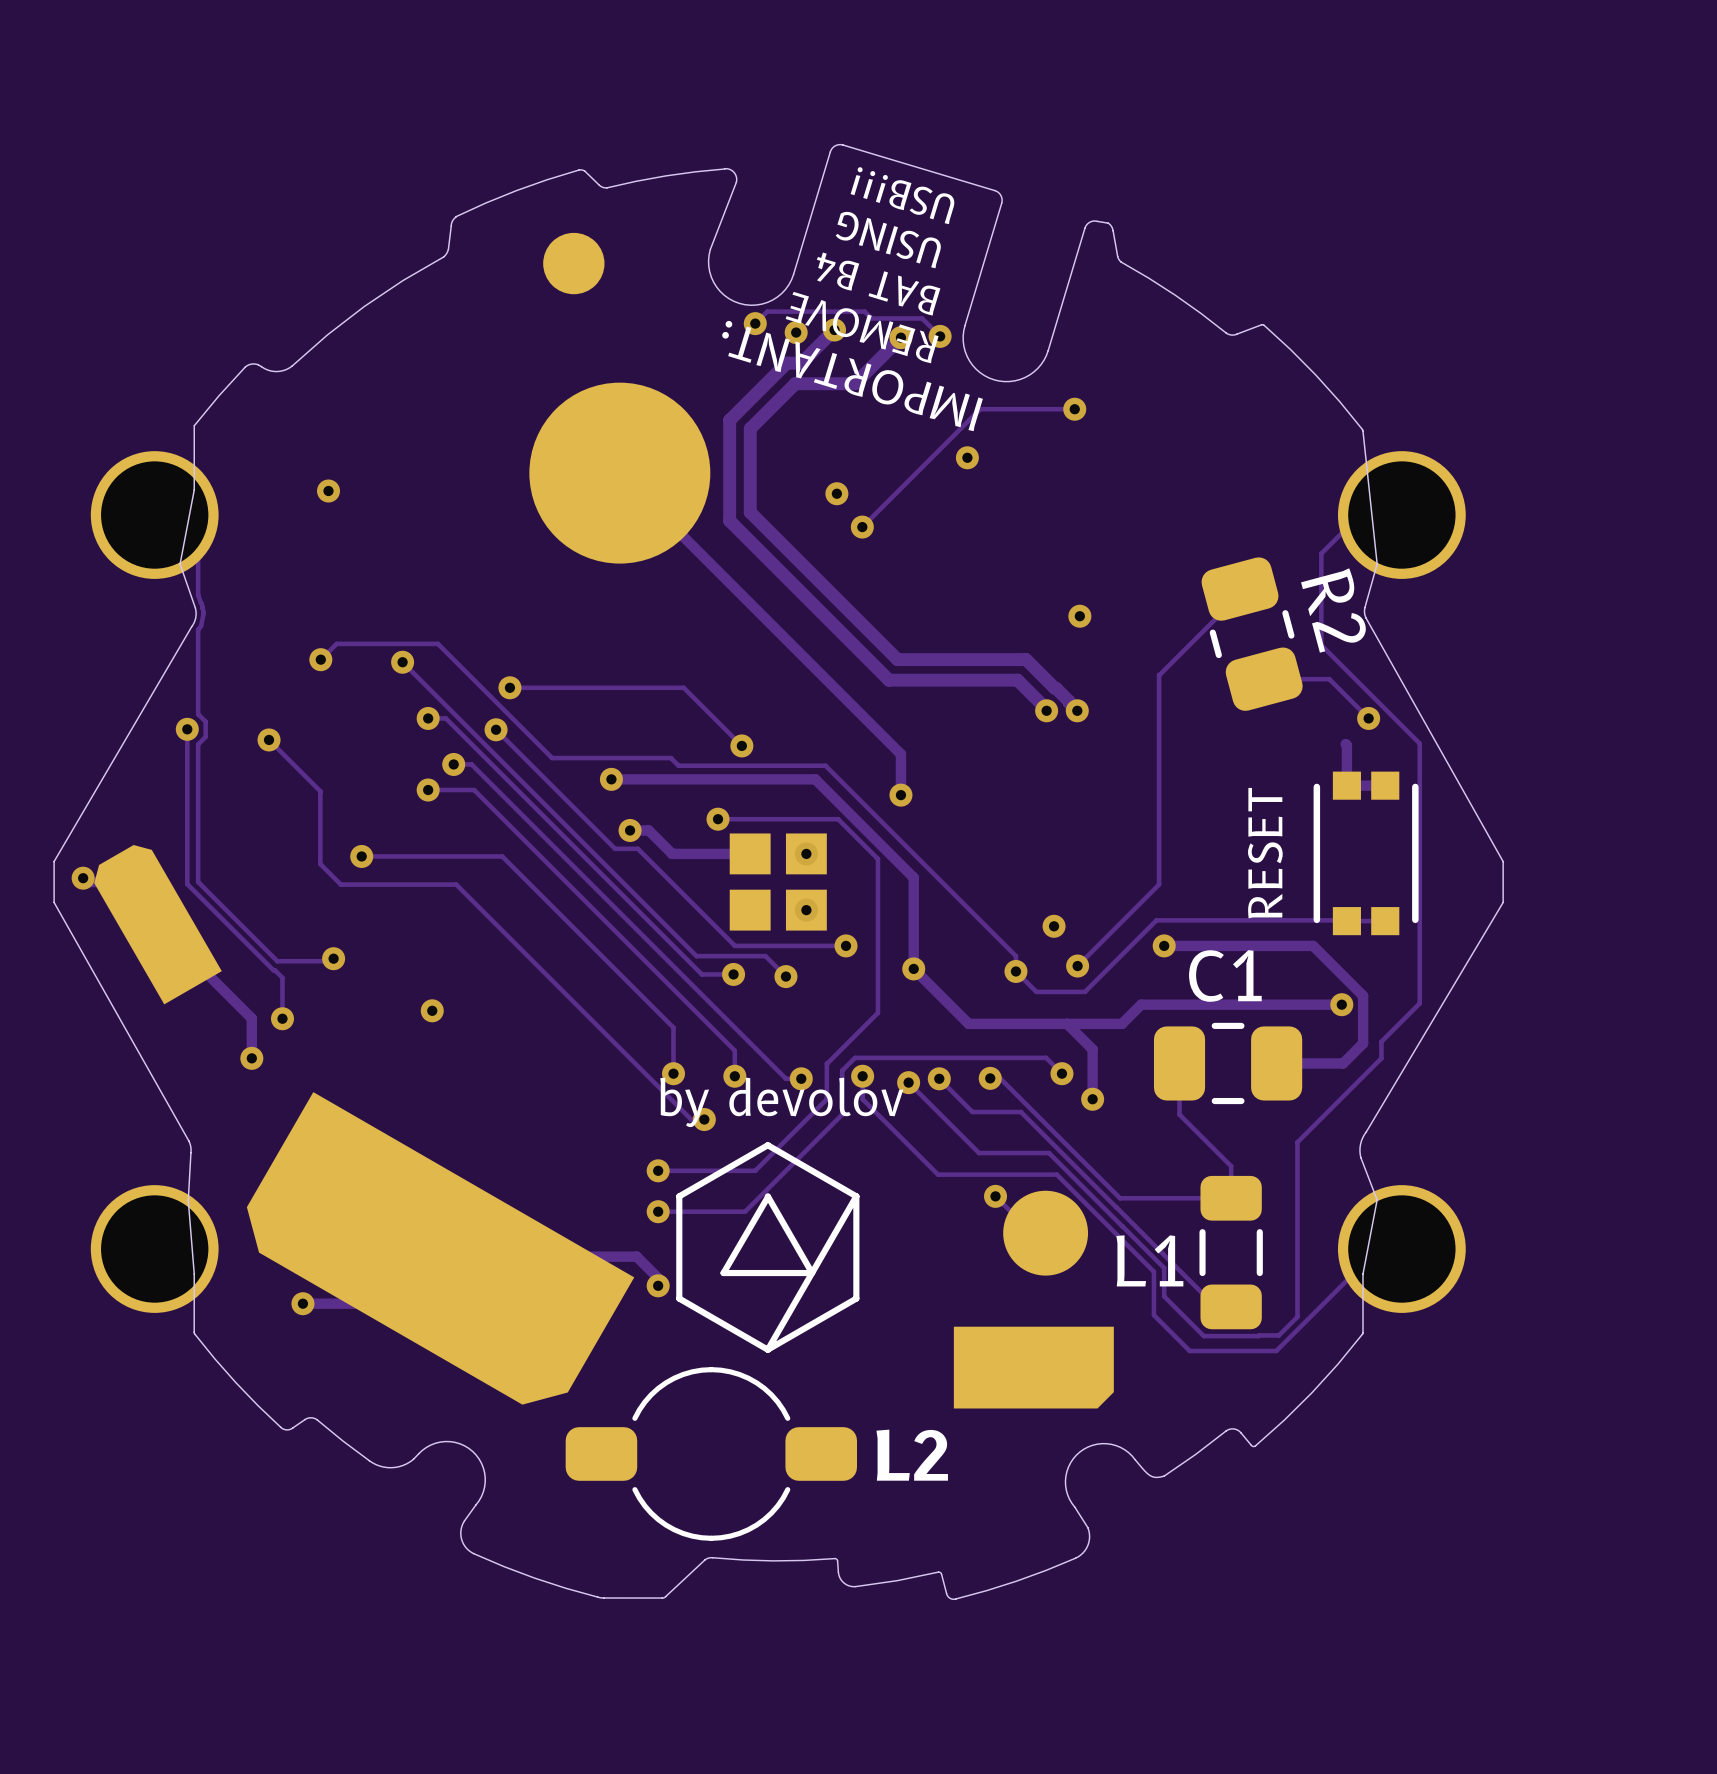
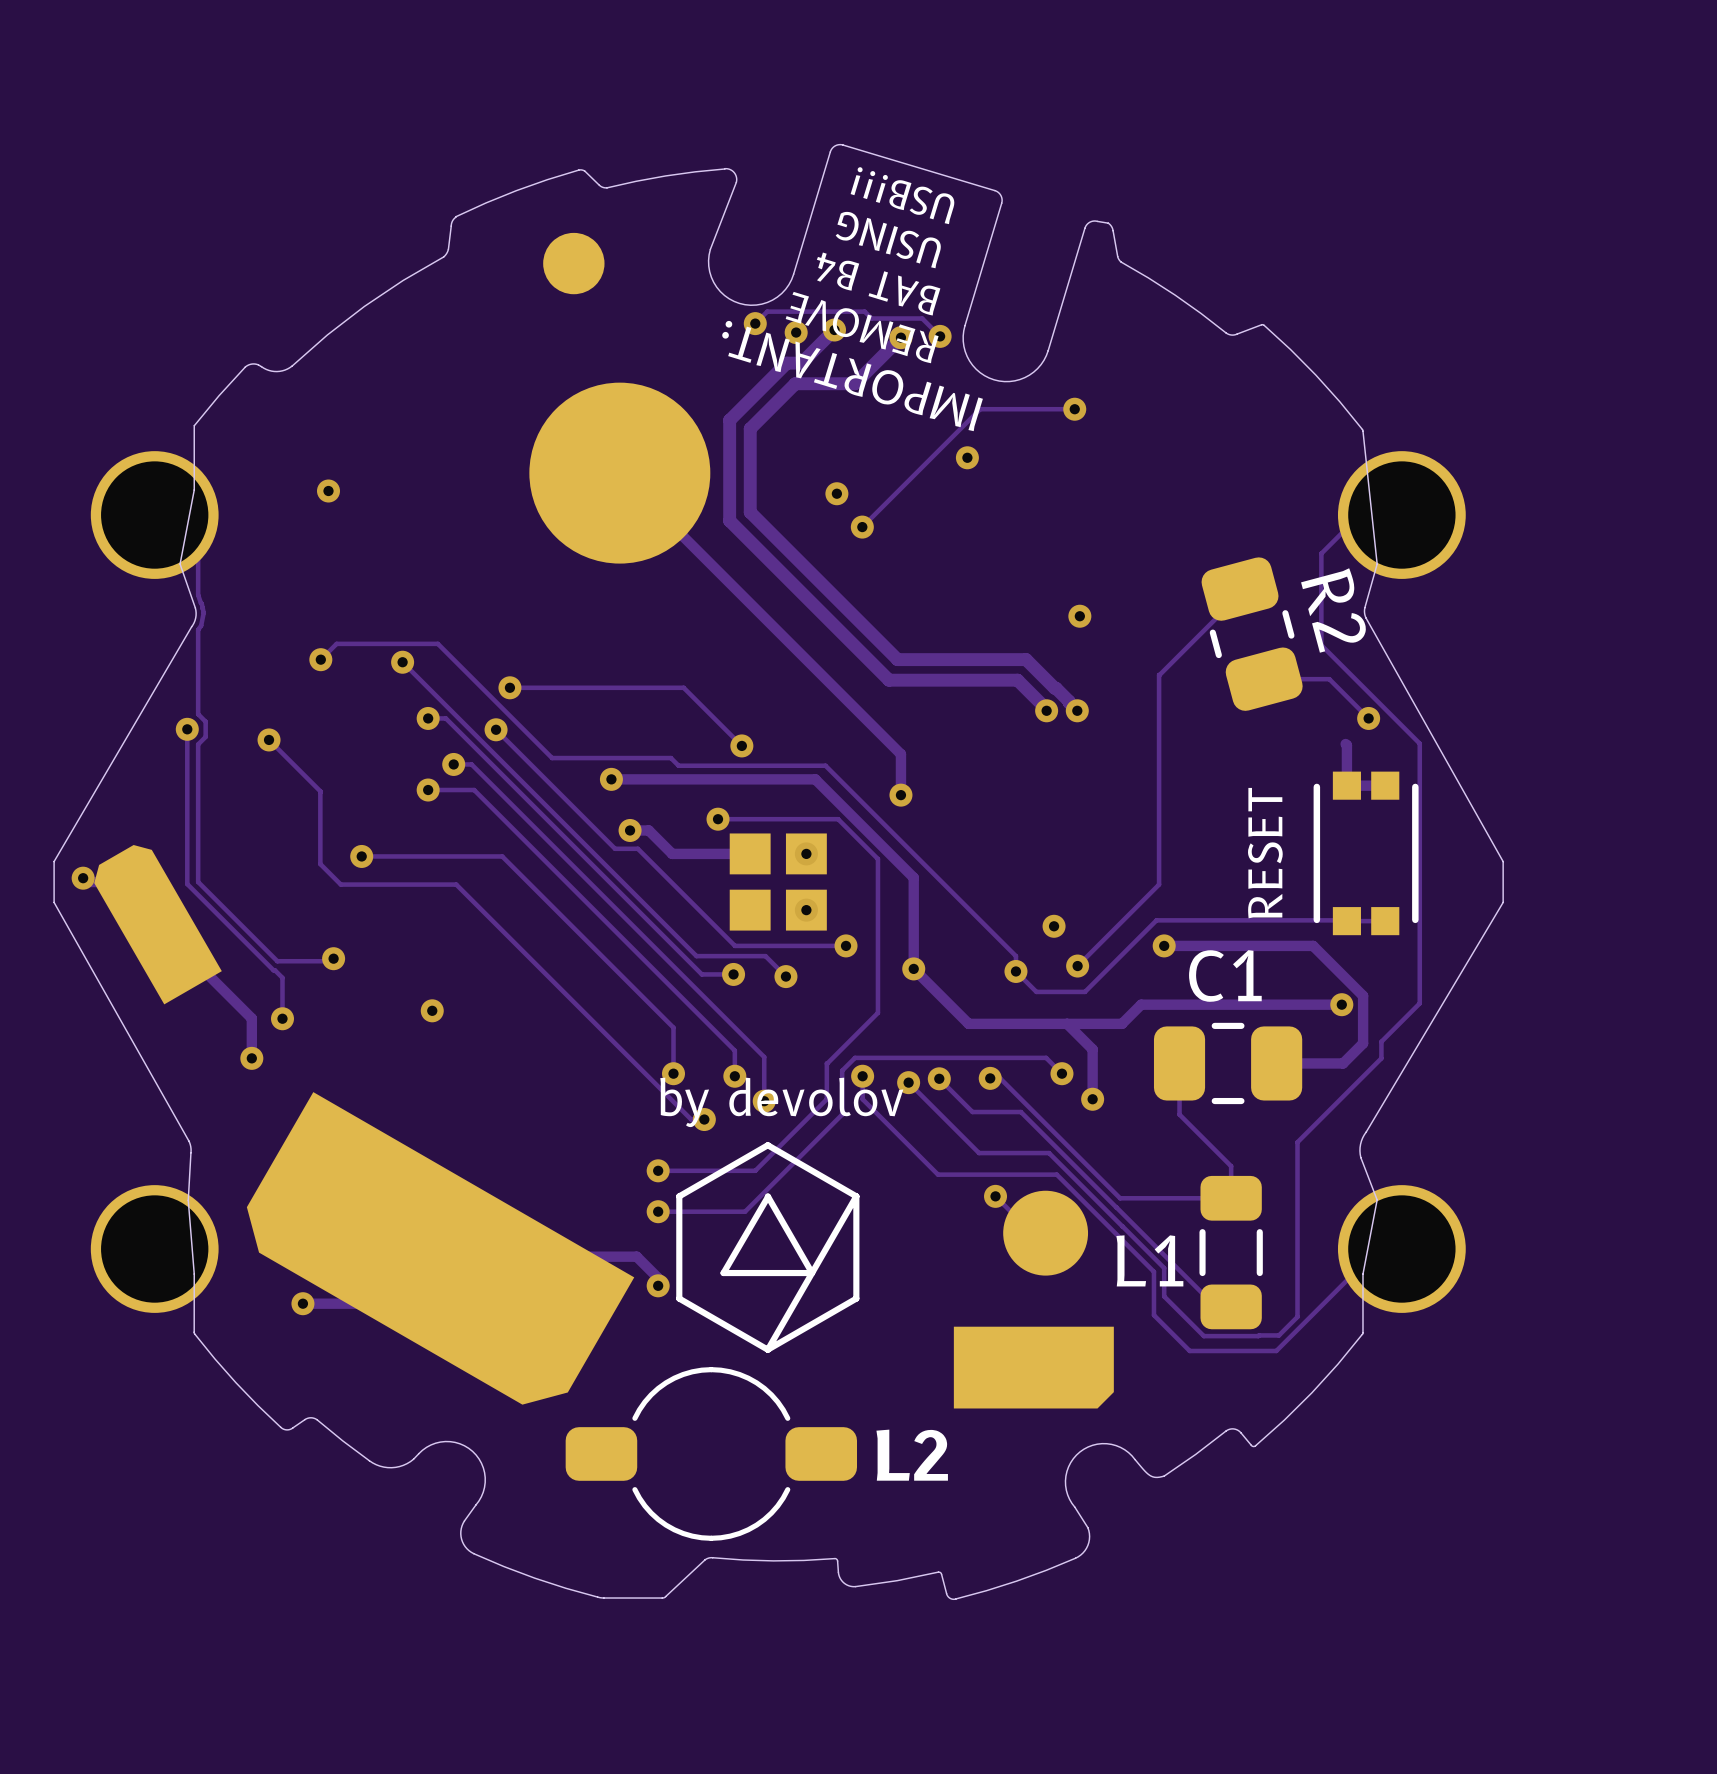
track: (764, 1057) (785, 1078) (801, 1078) -> (764, 1057) (764, 1101)
via position: (801, 1078) -> (764, 1101)

